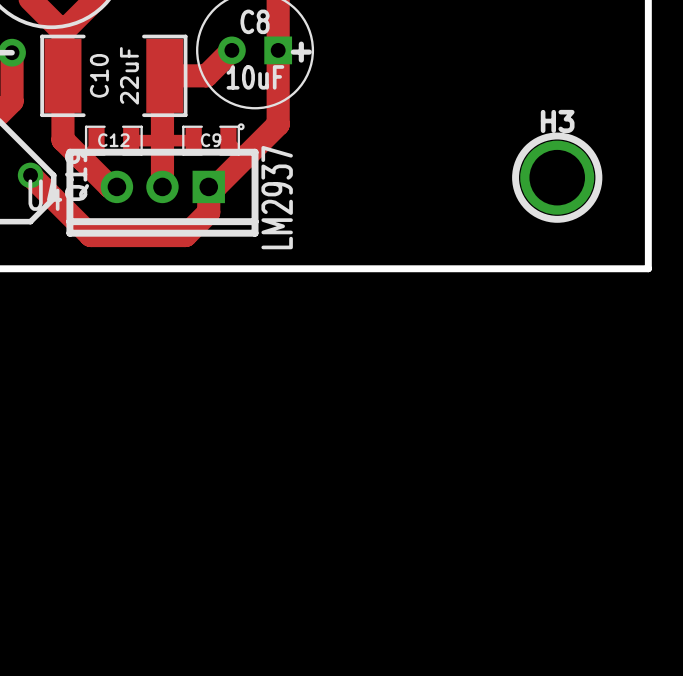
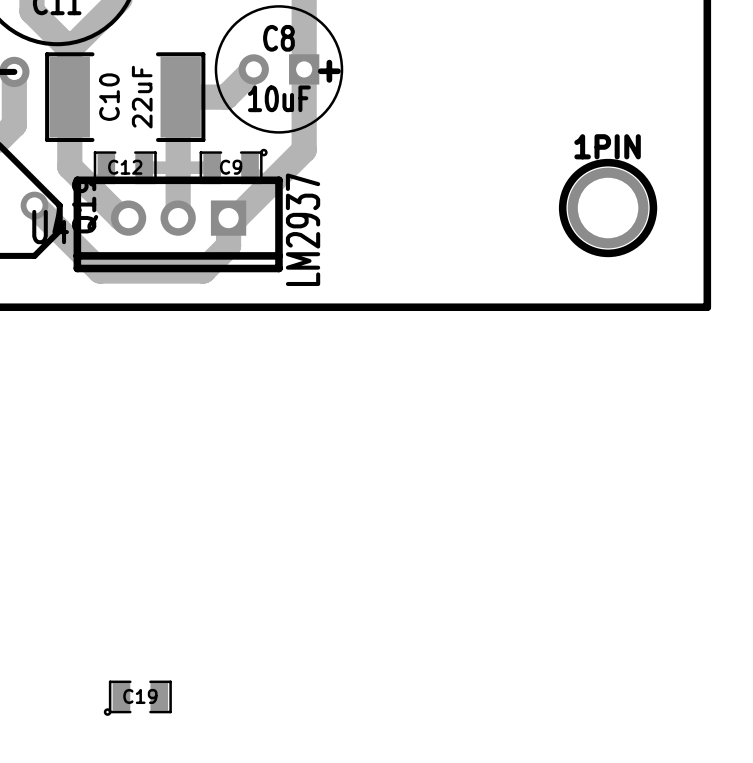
H3 name: H3 (557, 121) -> 1PIN (607, 146)
C19: none -> (137, 698)

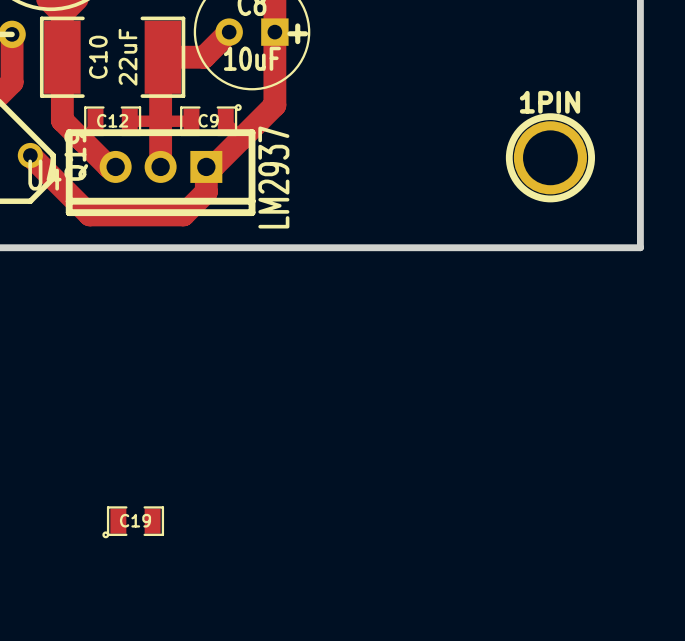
C19 position: (137, 698) -> (133, 522)

